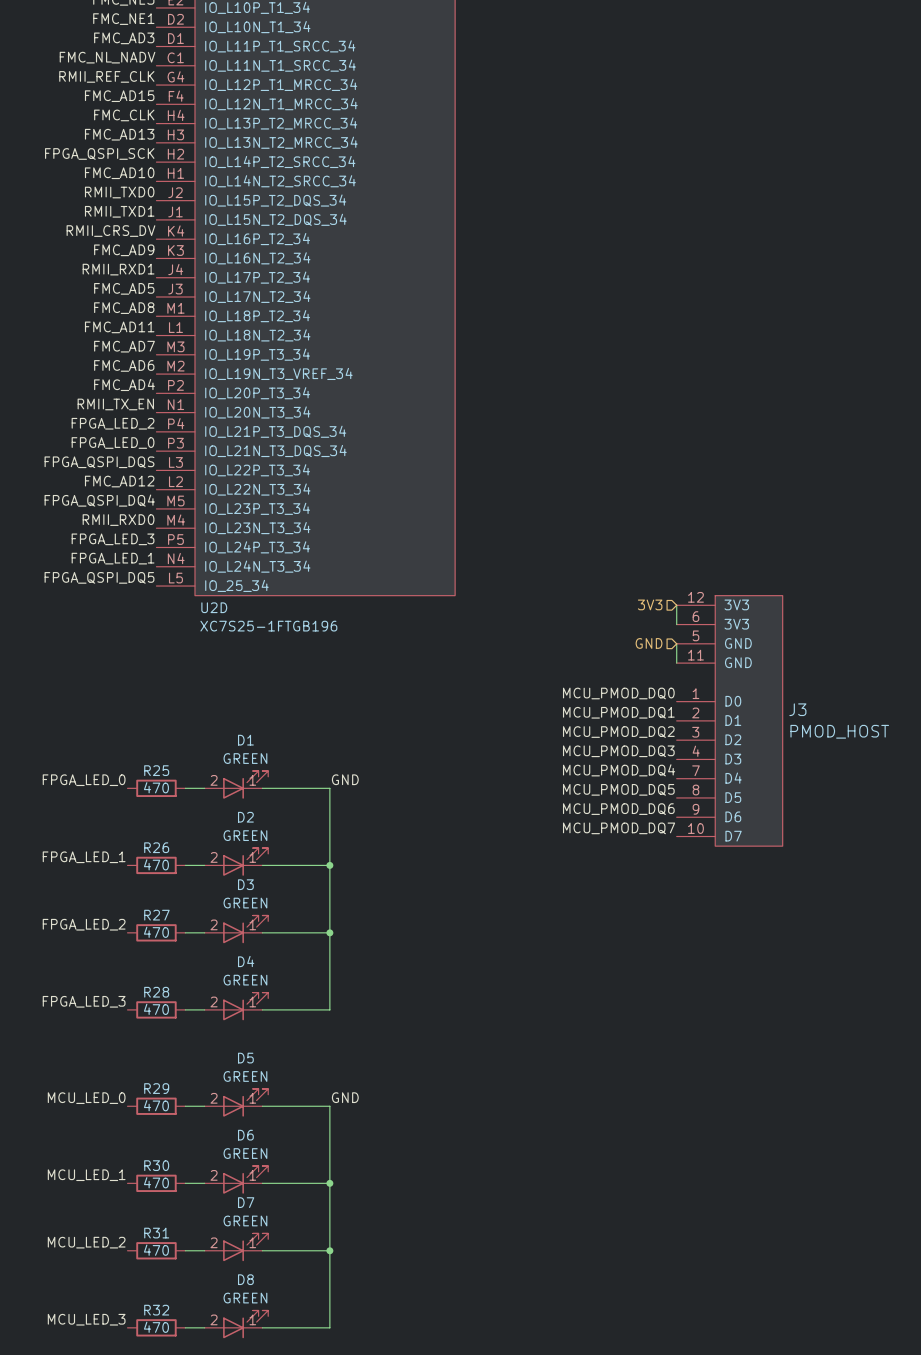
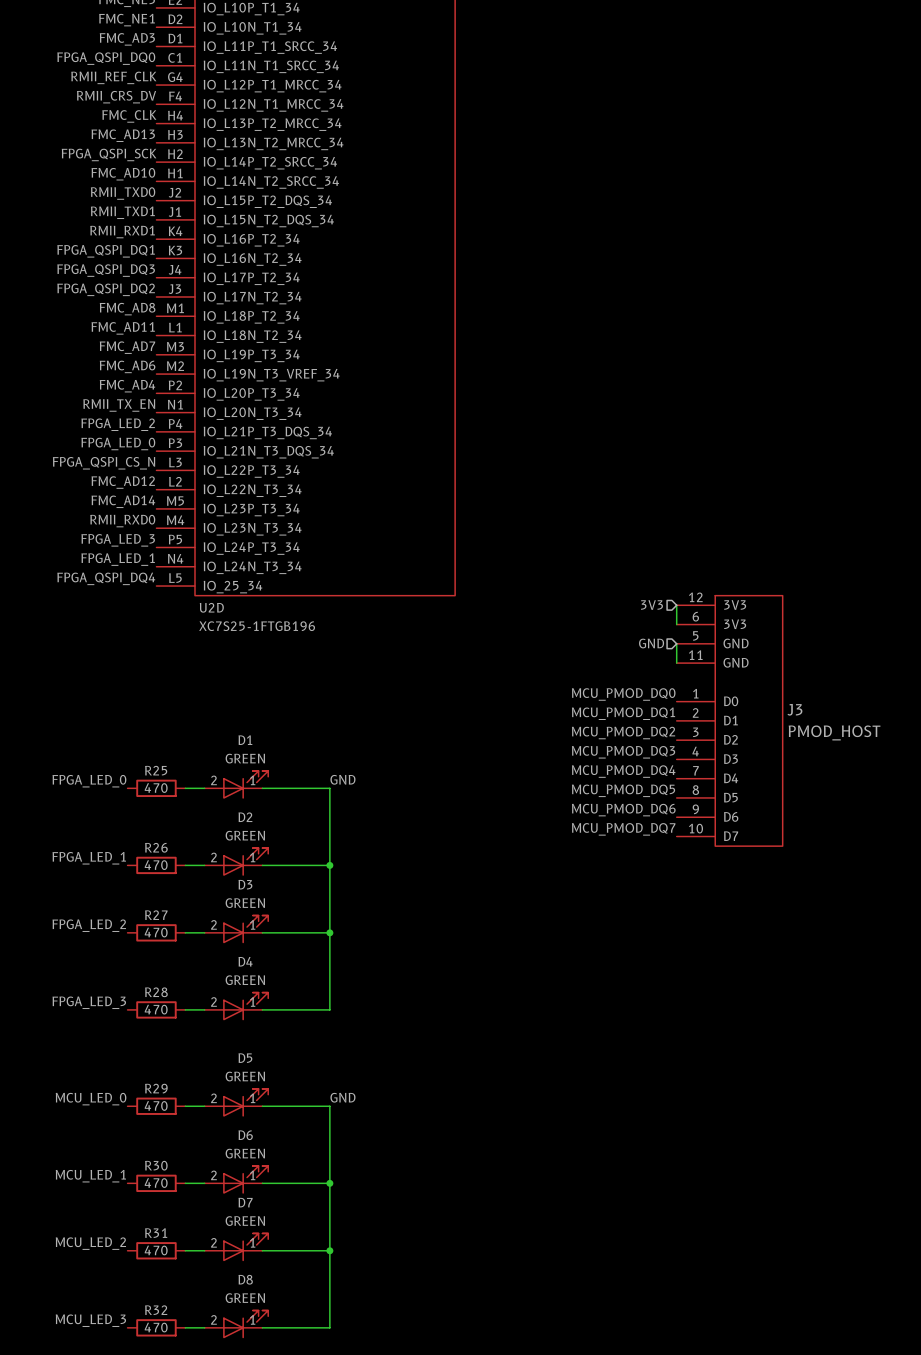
label: FMC_NL_NADV (107, 57) -> FPGA_QSPI_DQ0 (106, 58)
label: FMC_AD15 (119, 96) -> RMII_CRS_DV (116, 97)
label: RMII_CRS_DV (110, 231) -> RMII_RXD1 (122, 232)
label: FMC_AD9 (124, 250) -> FPGA_QSPI_DQ1 (106, 251)
label: RMII_RXD1 (118, 269) -> FPGA_QSPI_DQ3 (106, 270)
label: FMC_AD5 (124, 288) -> FPGA_QSPI_DQ2 (106, 289)
label: FPGA_QSPI_DQS (99, 462) -> FPGA_QSPI_CS_N (104, 463)
label: FPGA_QSPI_DQ4 (99, 500) -> FMC_AD14 (123, 501)
label: FPGA_QSPI_DQ5 (99, 577) -> FPGA_QSPI_DQ4 (106, 578)

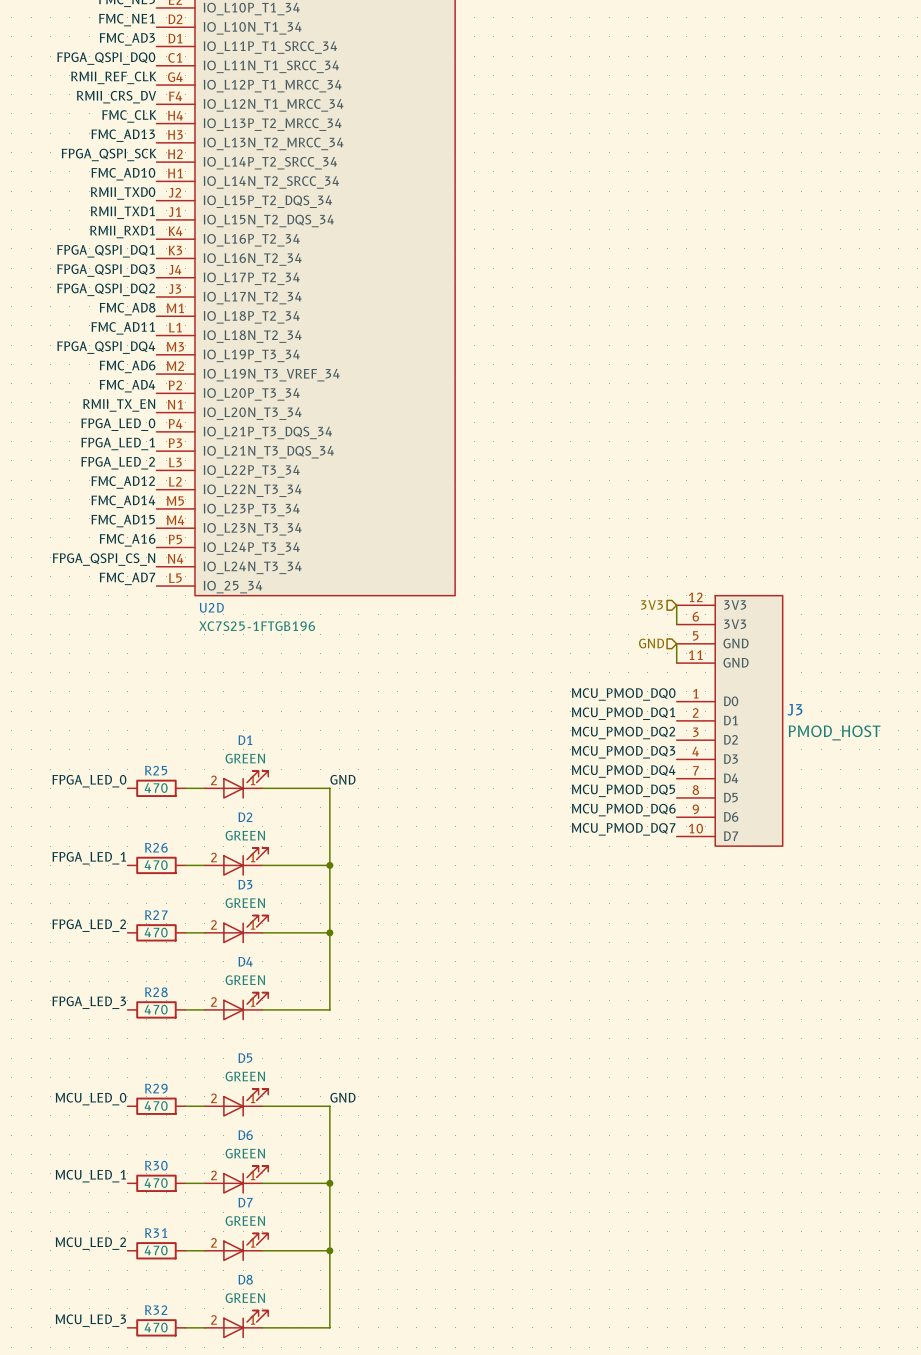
label: FMC_AD7 (127, 347) -> FPGA_QSPI_DQ4 (106, 347)
label: FPGA_LED_2 (118, 424) -> FPGA_LED_0 (118, 424)
label: FPGA_LED_0 (118, 443) -> FPGA_LED_1 (118, 443)
label: FPGA_QSPI_CS_N (104, 463) -> FPGA_LED_2 (118, 463)
label: RMII_RXD0 (122, 521) -> FMC_AD15 (123, 521)
label: FPGA_LED_3 (118, 540) -> FMC_A16 (127, 540)
label: FPGA_LED_1 (118, 559) -> FPGA_QSPI_CS_N (104, 559)
label: FPGA_QSPI_DQ4 (106, 578) -> FMC_AD7 (127, 578)

